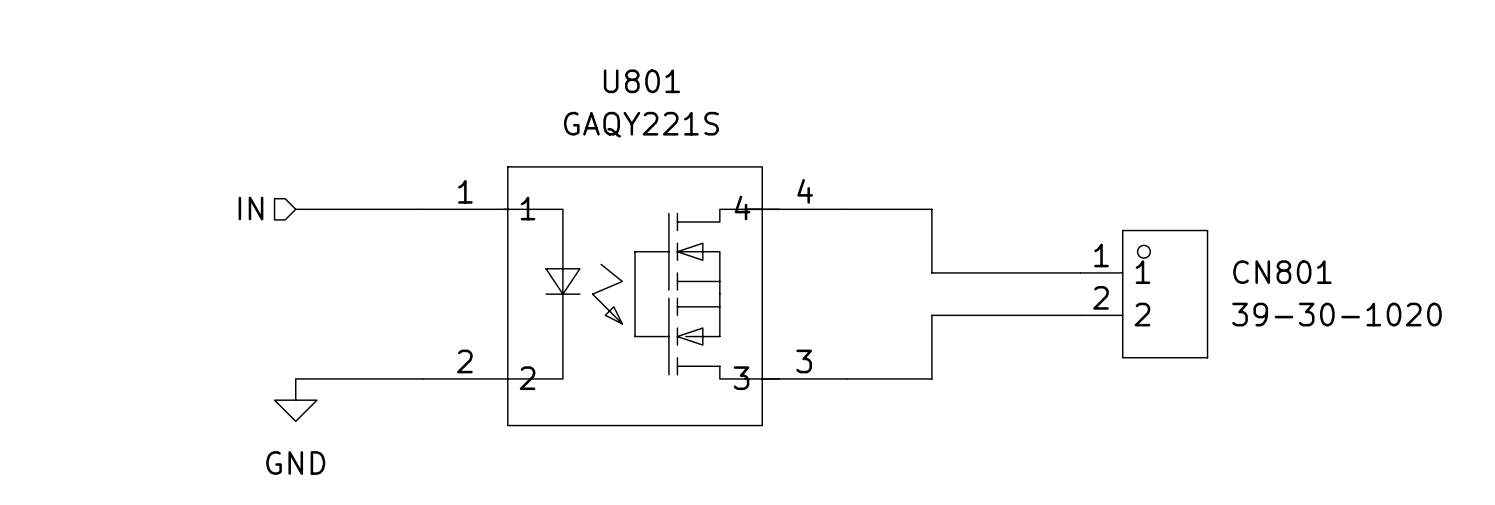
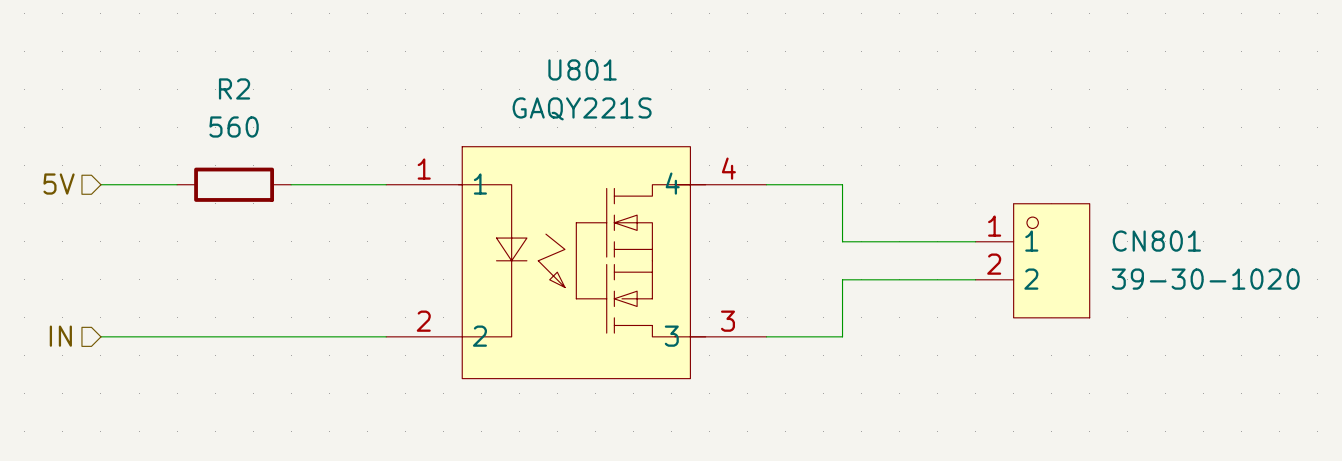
hierarchical label: none -> 5V (59, 184)
hierarchical label position: IN (250, 208) -> IN (60, 336)
wire: none -> (100, 184) (177, 184)
R2: none -> 560 (234, 184)
wire: none -> (100, 336) (272, 336)
power symbol: GND (295, 400) -> none

